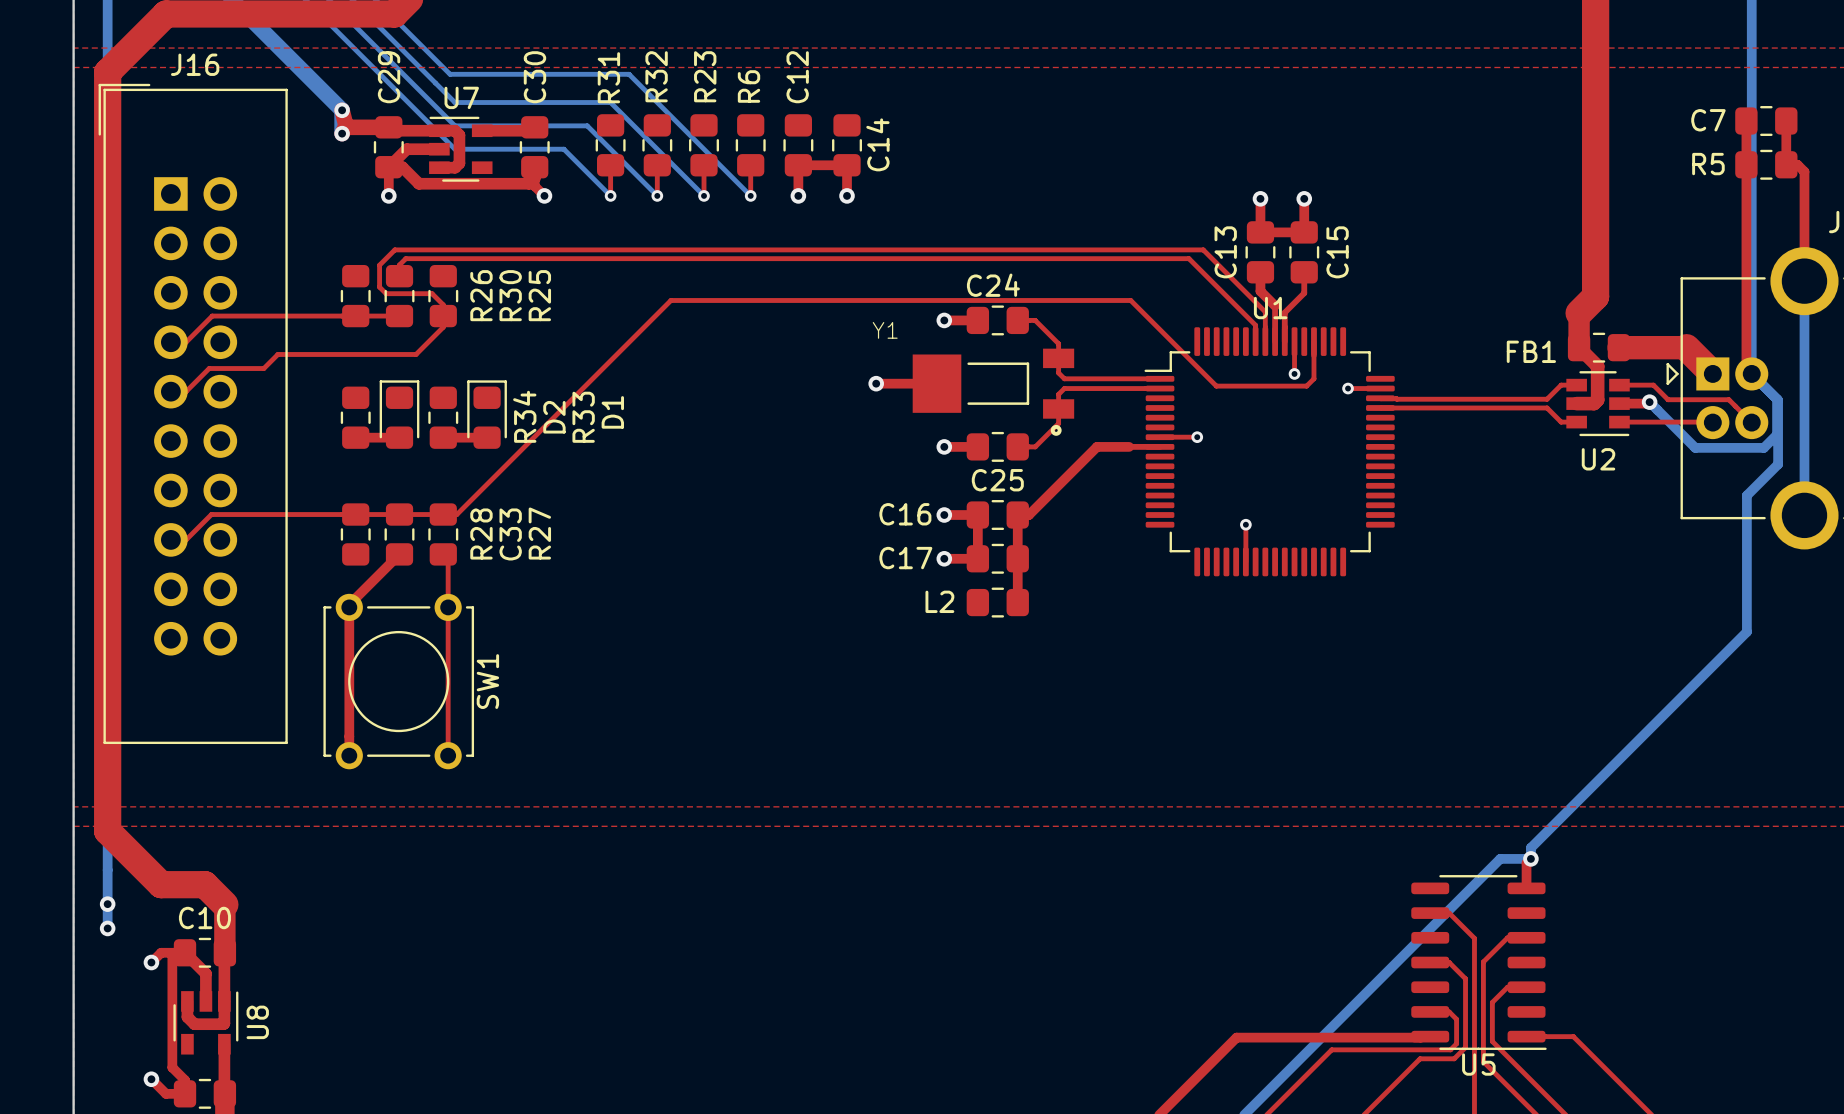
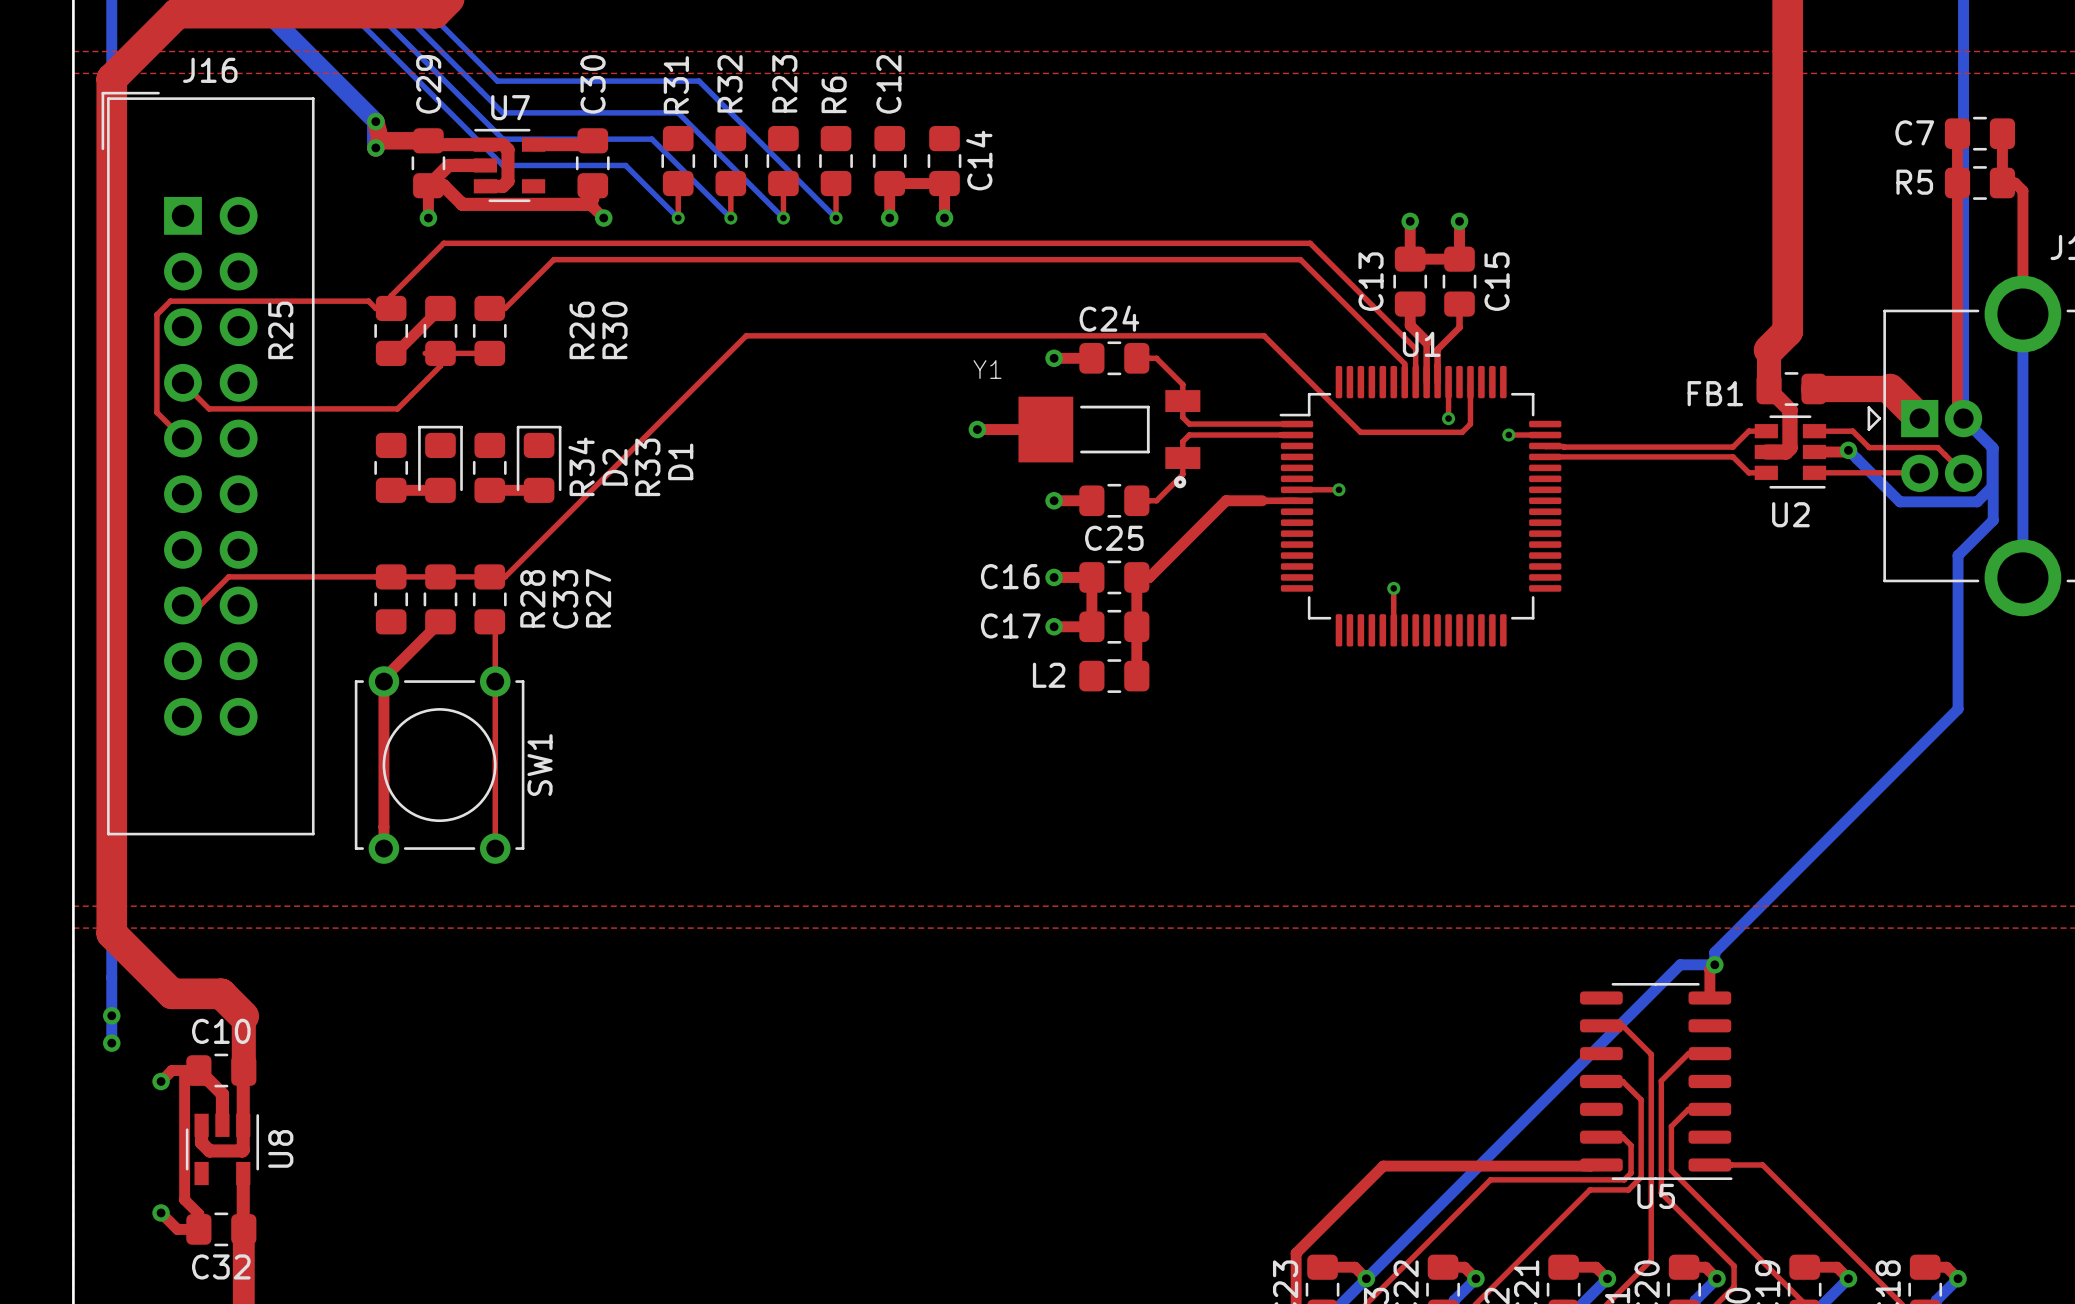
top track: (1203, 249) (394, 249) (379, 265) (379, 287) (386, 293) (432, 293) (443, 304) (443, 327) (416, 354) (277, 354) (263, 368) (209, 368) (186, 391) (170, 391) -> (1345, 278) (1310, 243) (443, 243) (391, 295) (391, 308) (375, 308) (368, 301) (170, 301) (156, 314) (156, 412) (182, 438)
top track: (1188, 258) (405, 258) (399, 264) (399, 276) -> (1329, 288) (1300, 259) (553, 259) (505, 308) (489, 308)
R26 name: R26 (481, 295) -> R25 (280, 330)
R30 name: R30 (510, 295) -> R26 (582, 330)
R25 name: R25 (539, 295) -> R30 (614, 330)
top track: (355, 316) (212, 316) (186, 342) (170, 342) -> (489, 353) (440, 353) (440, 365) (397, 408) (209, 408) (182, 382)
top track: (359, 316) (385, 316) -> (395, 353) (440, 308)

